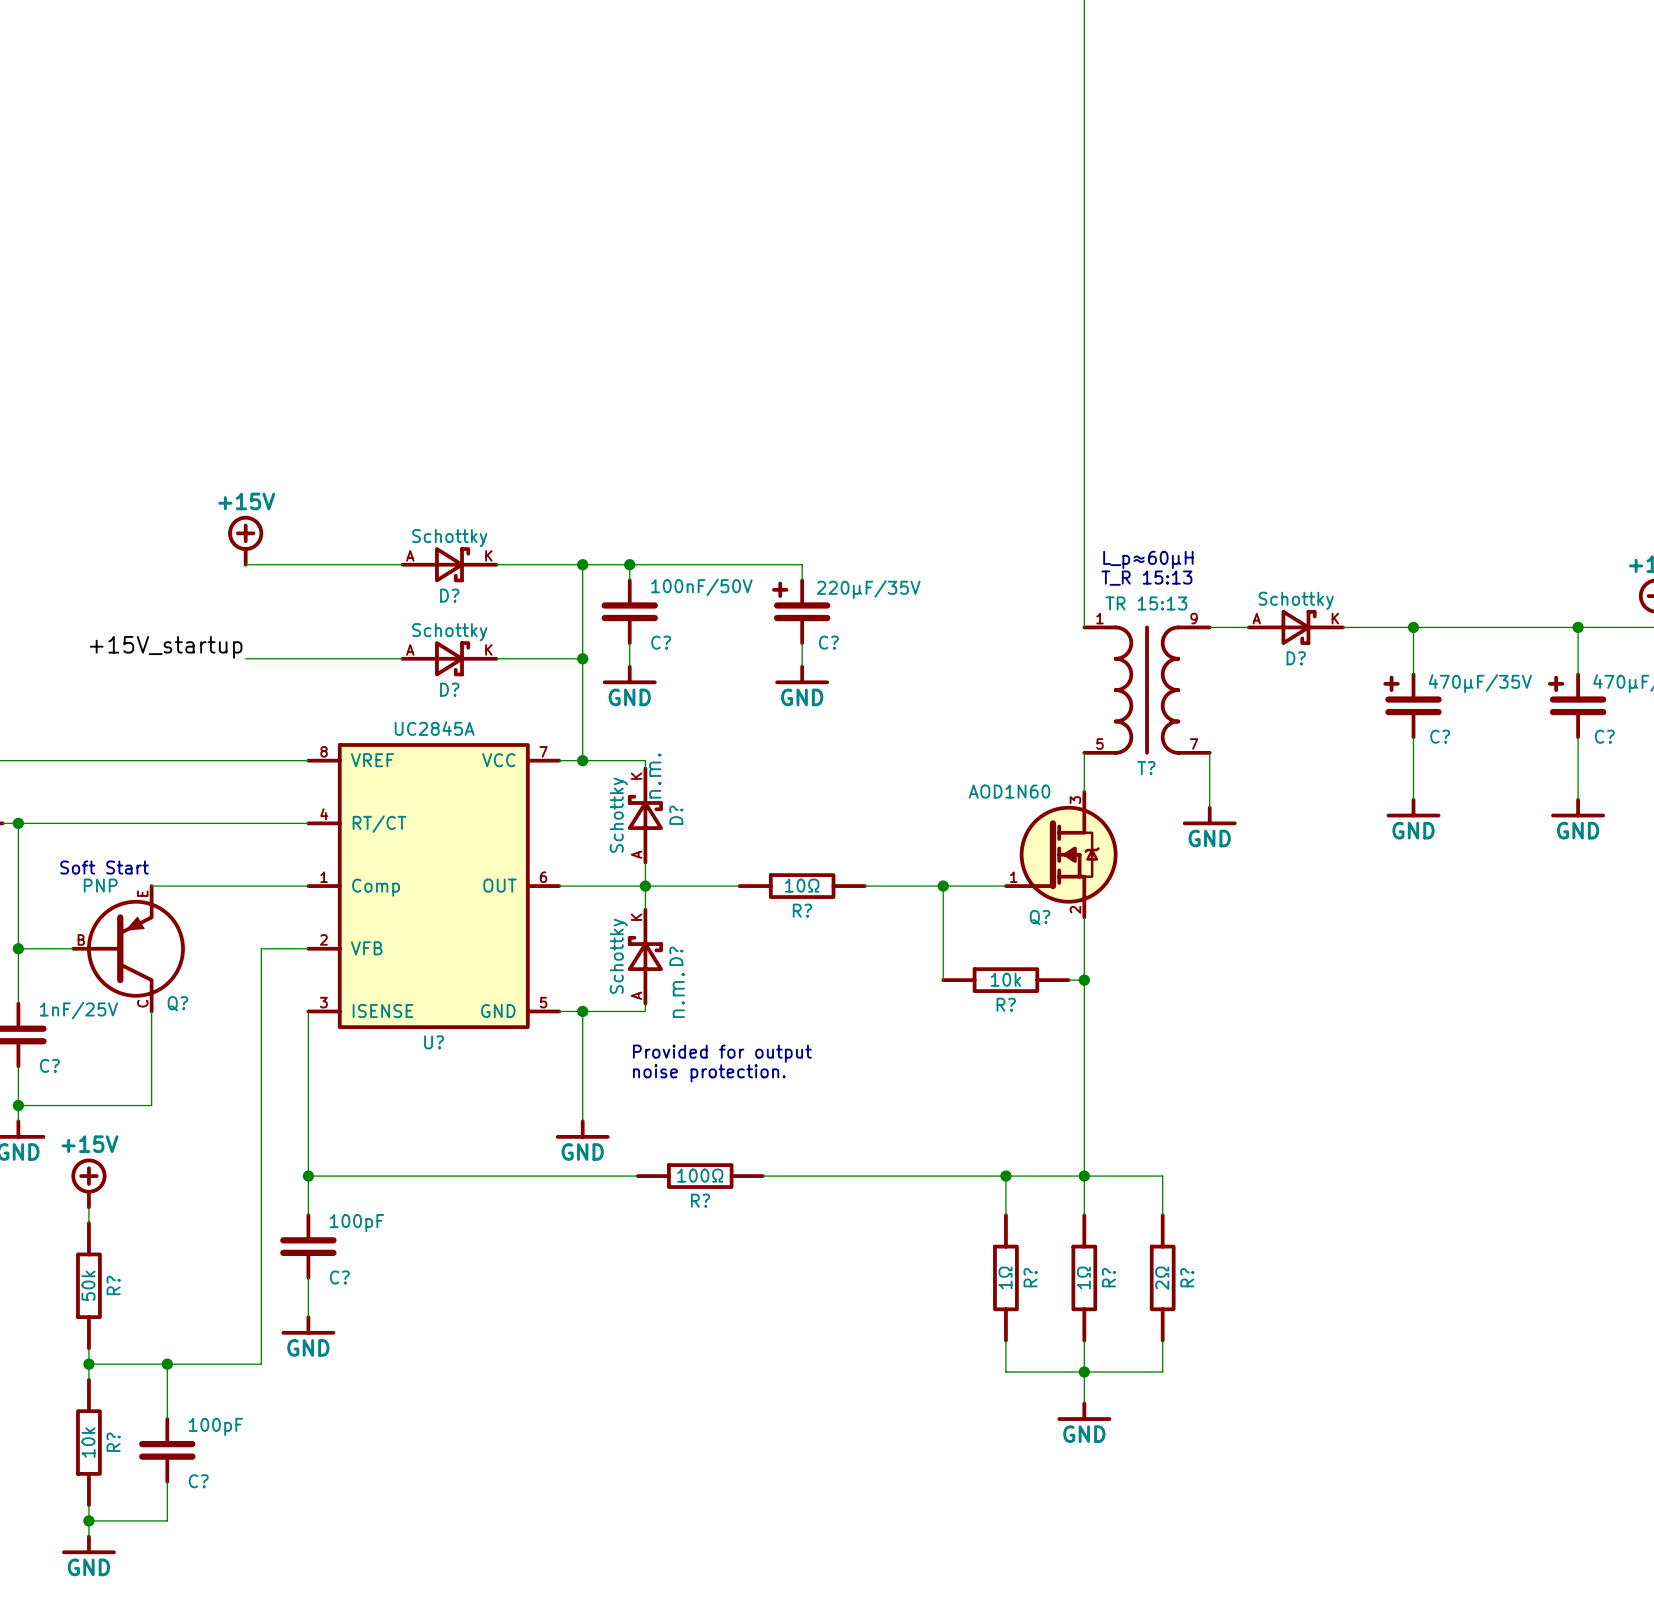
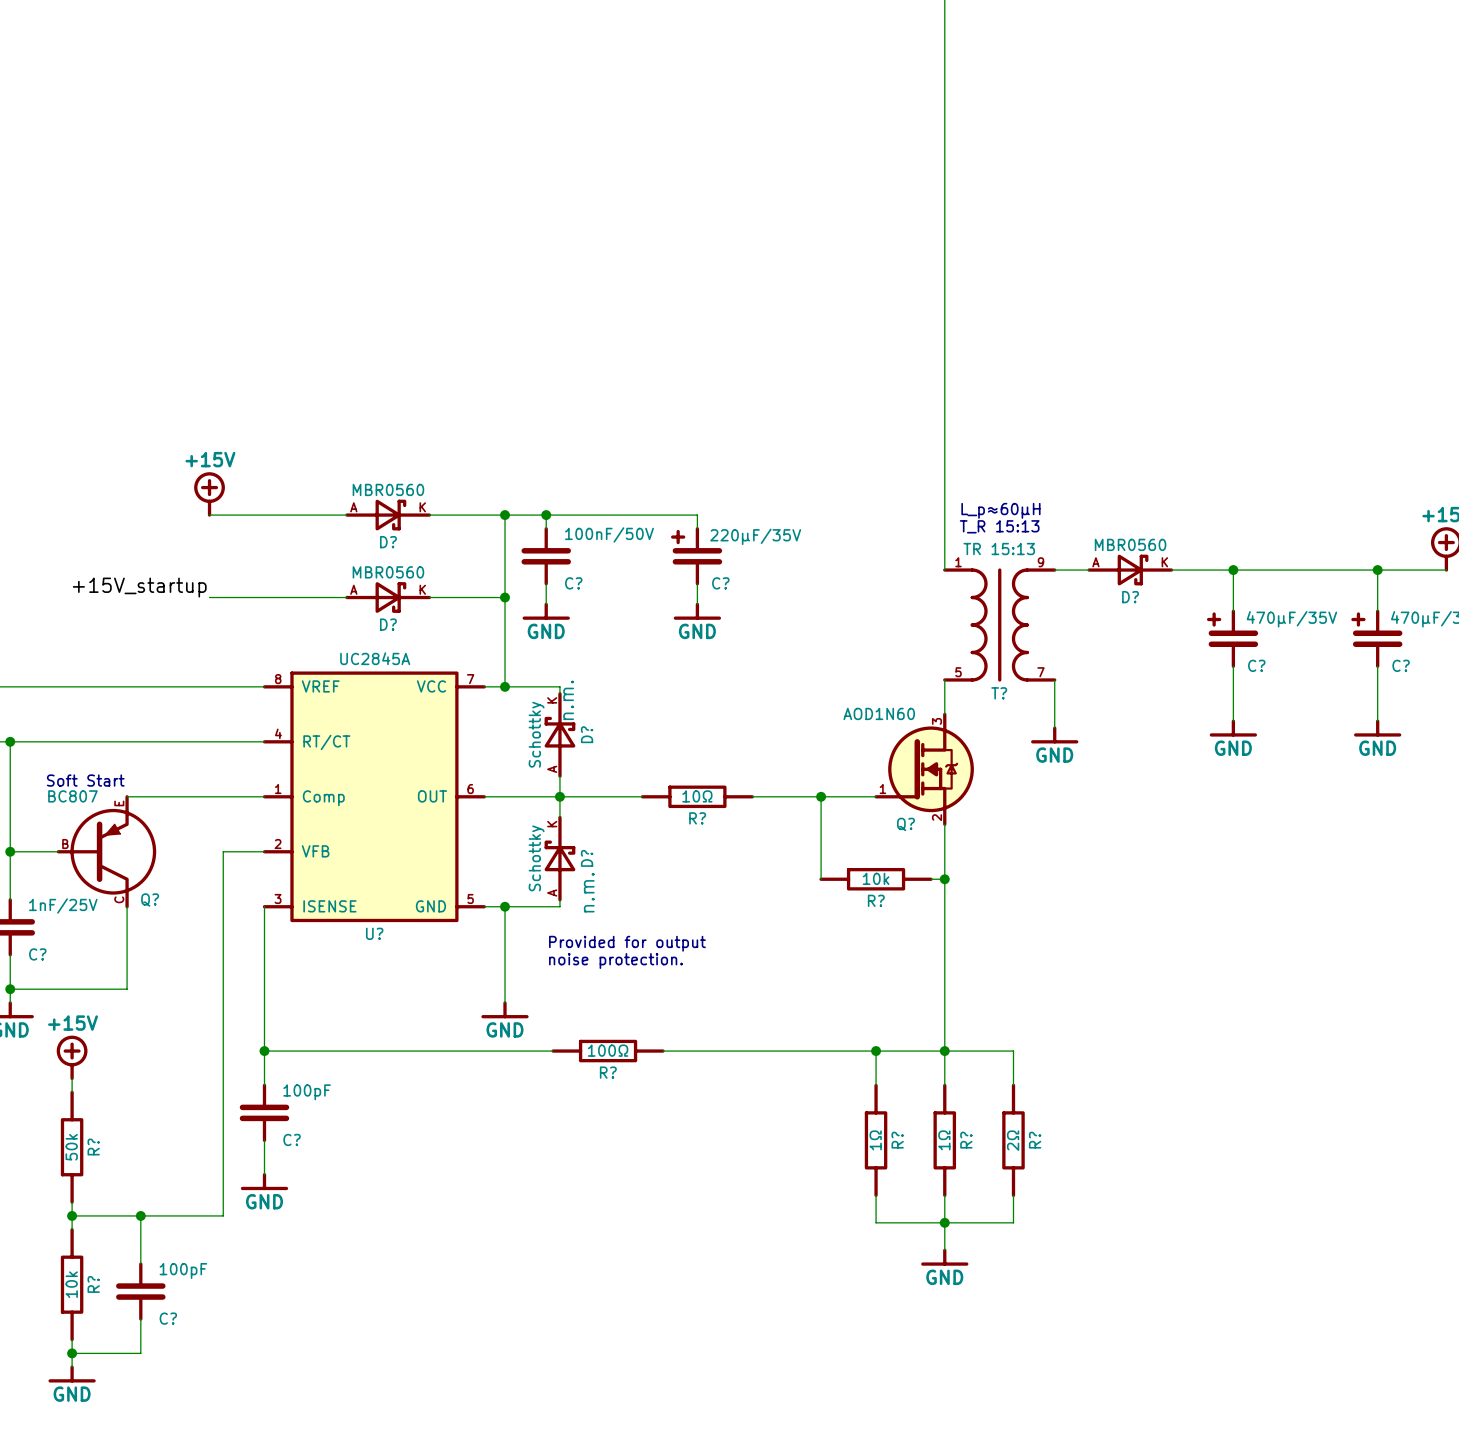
D? value: Schottky (449, 538) -> MBR0560 (388, 489)
D? value: Schottky (1296, 600) -> MBR0560 (1130, 544)
D? value: Schottky (449, 632) -> MBR0560 (388, 572)
Q? value: PNP (100, 885) -> BC807 (72, 796)

